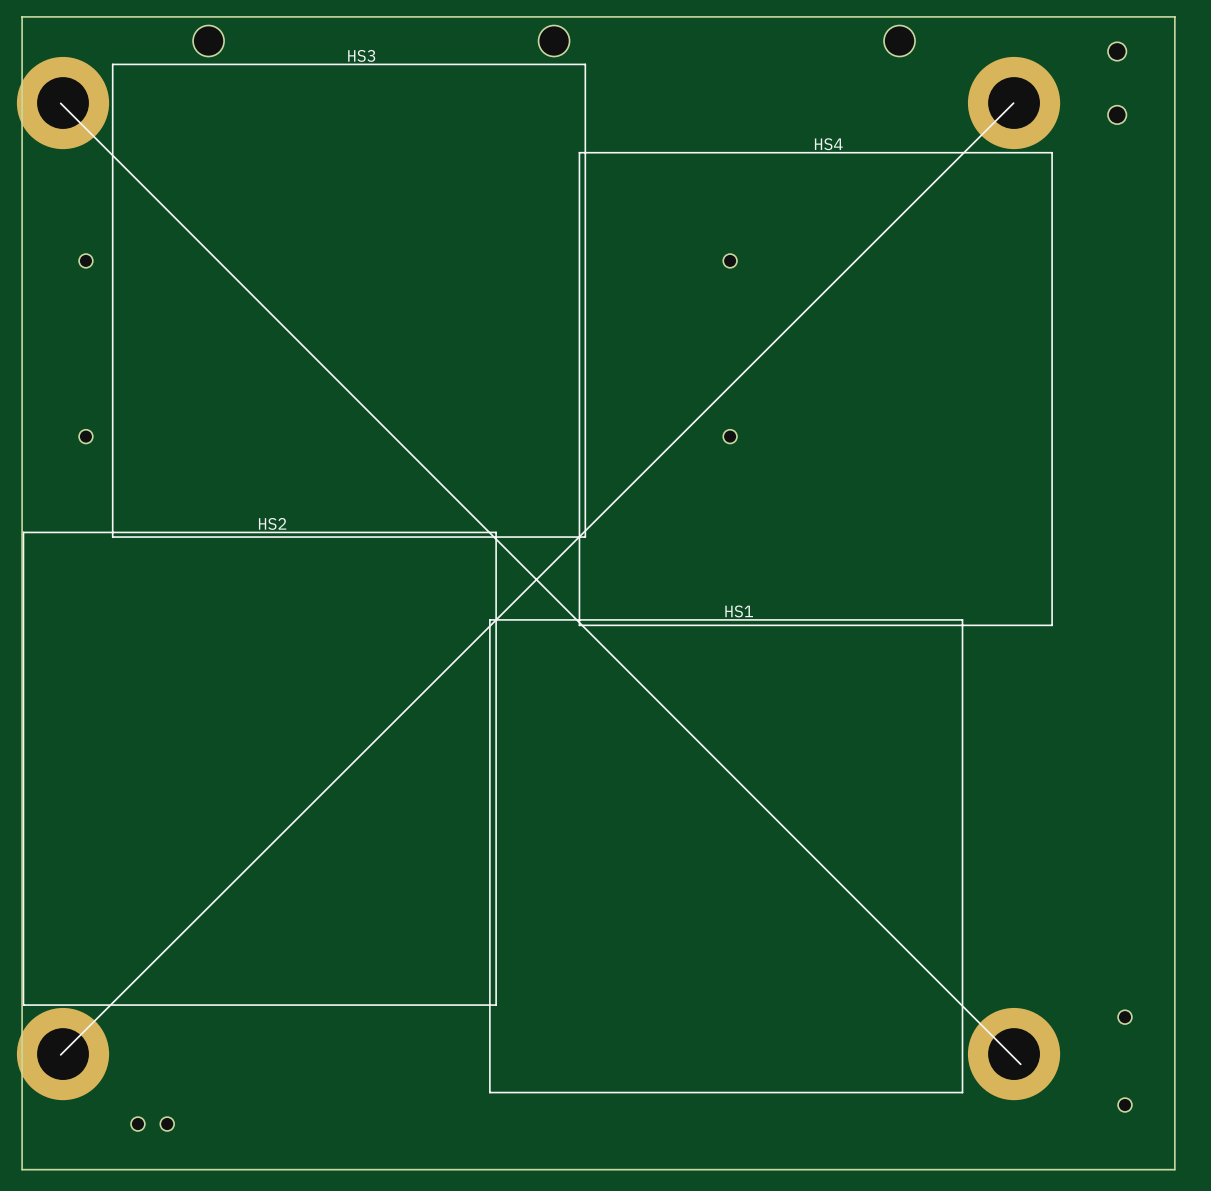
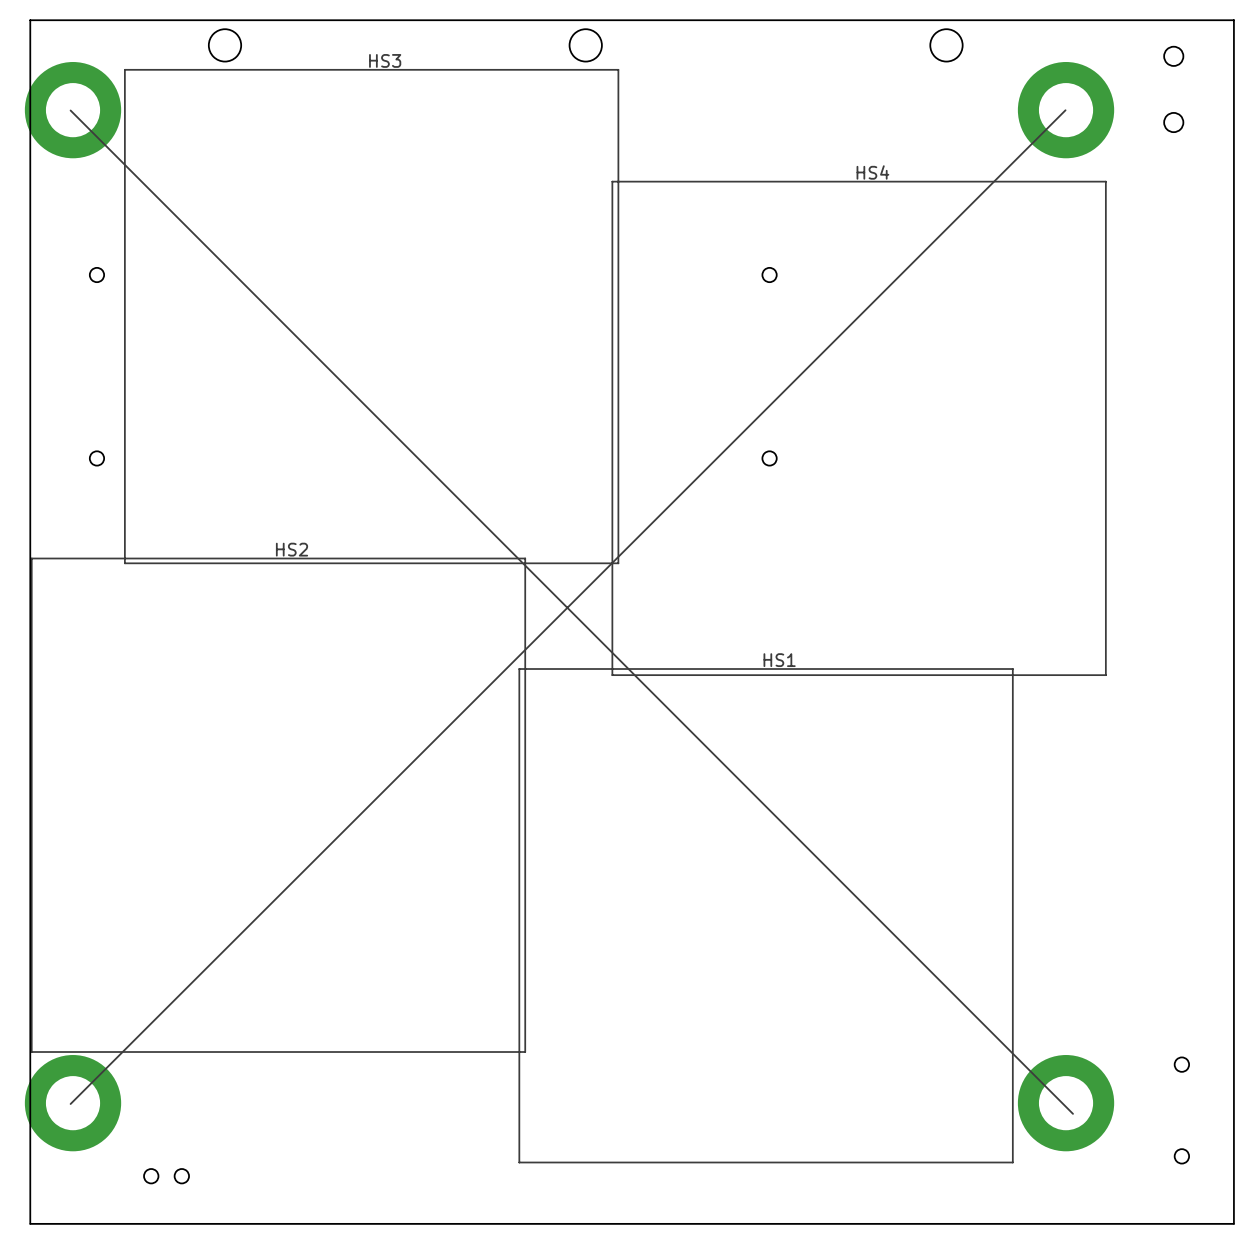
HS4 position: (815, 389) -> (859, 428)
HS1 position: (726, 856) -> (766, 915)

